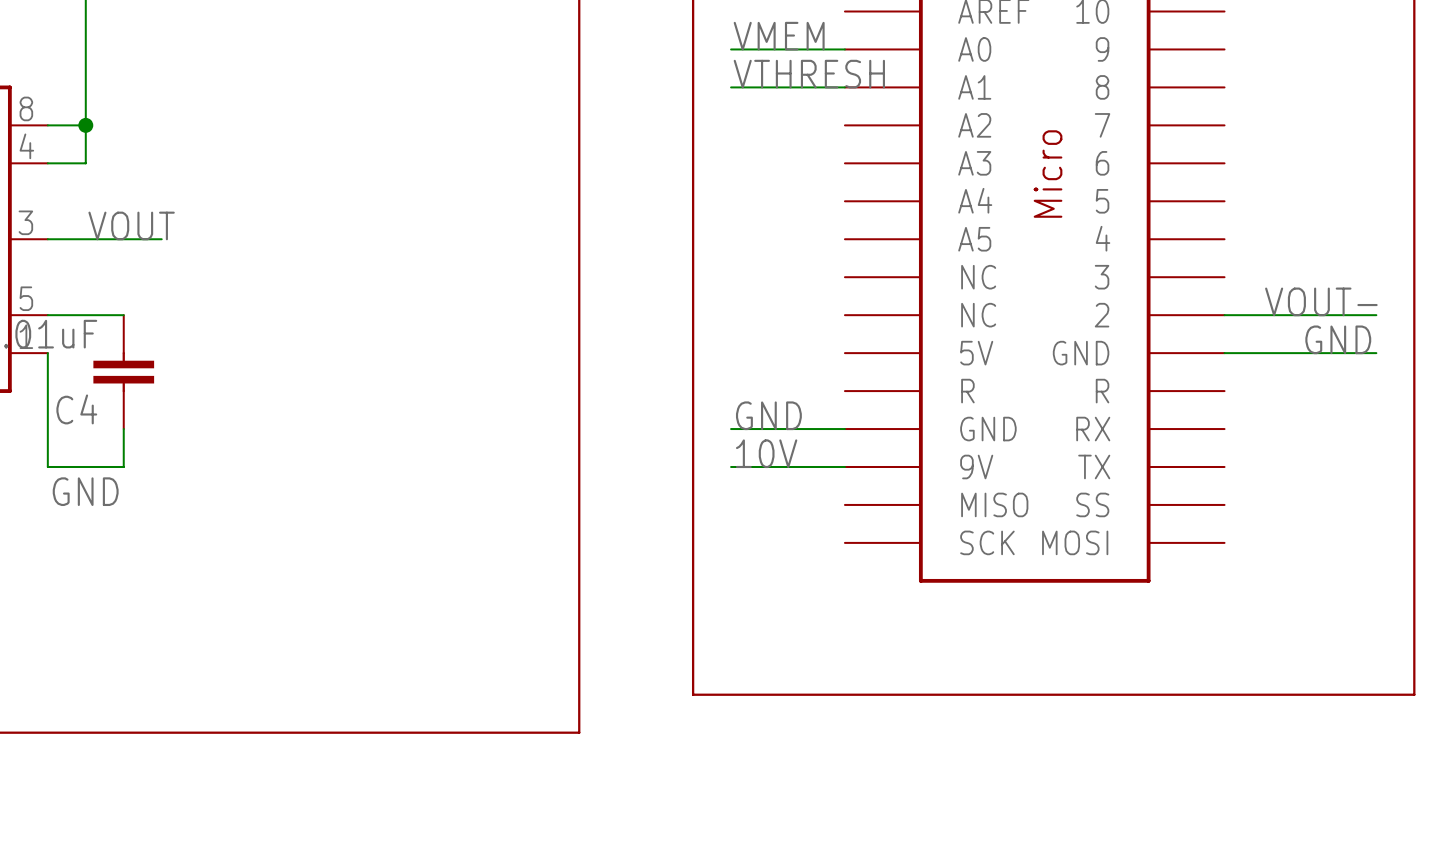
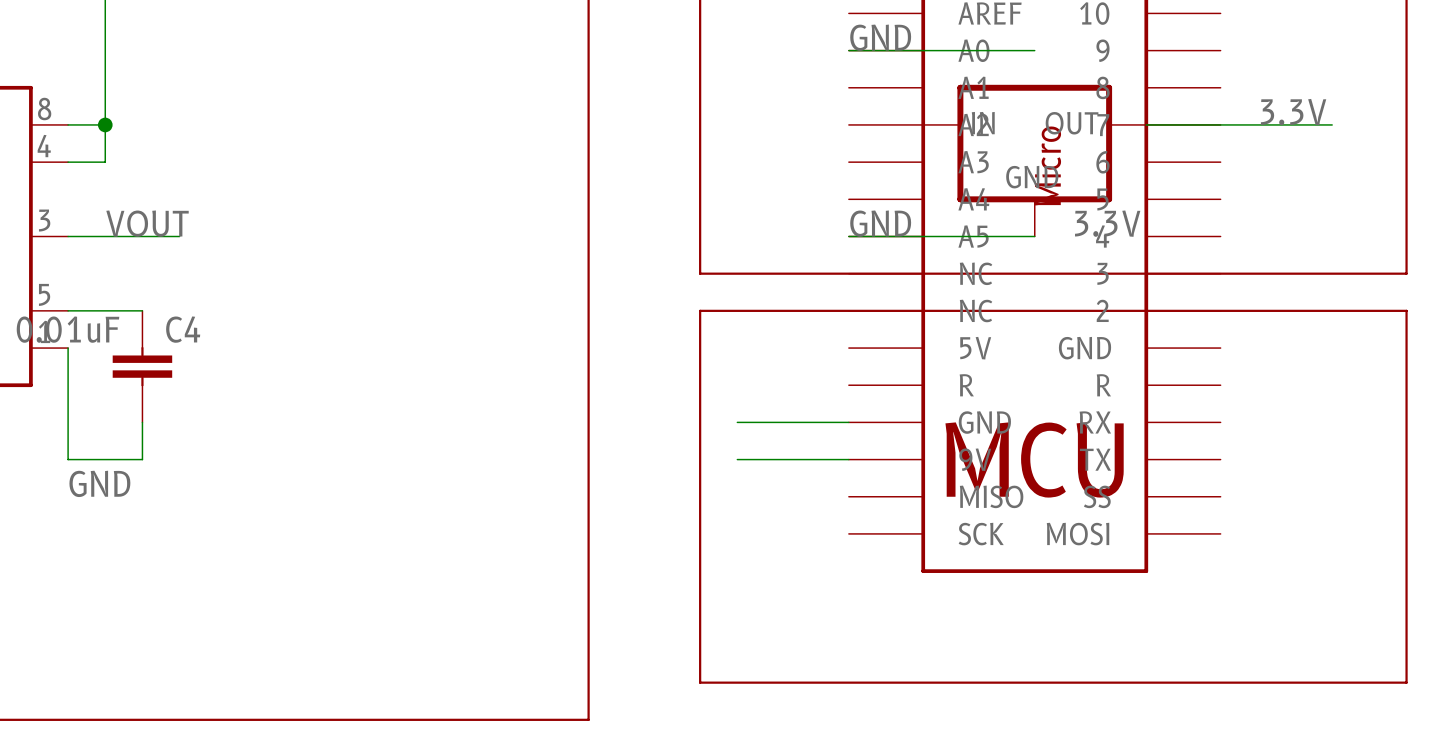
label: VMEM (779, 36) -> none
label: none -> GND (880, 37)
wire: (731, 49) (844, 49) -> (1034, 50) (848, 50)
label: VTHRESH (809, 74) -> none
wire: (731, 87) (844, 87) -> none
label: none -> 3.3V (1293, 112)
wire: none -> (1146, 124) (1332, 124)
3.3V: none -> (1034, 160)
label: none -> GND (880, 223)
wire: none -> (848, 236) (1034, 236)
line: (693, 277) (693, 315) -> (700, 273) (1406, 273)
line: (1414, 277) (1414, 315) -> (700, 310) (1406, 310)
label: VOUT- (1321, 301) -> none
label: GND (1338, 339) -> none
wire: (1224, 353) (1376, 353) -> none
C4 name position: C4 (76, 409) -> C4 (183, 329)
label: GND (768, 415) -> none
label: 10V (766, 453) -> none
text: none -> MCU (1034, 459)

